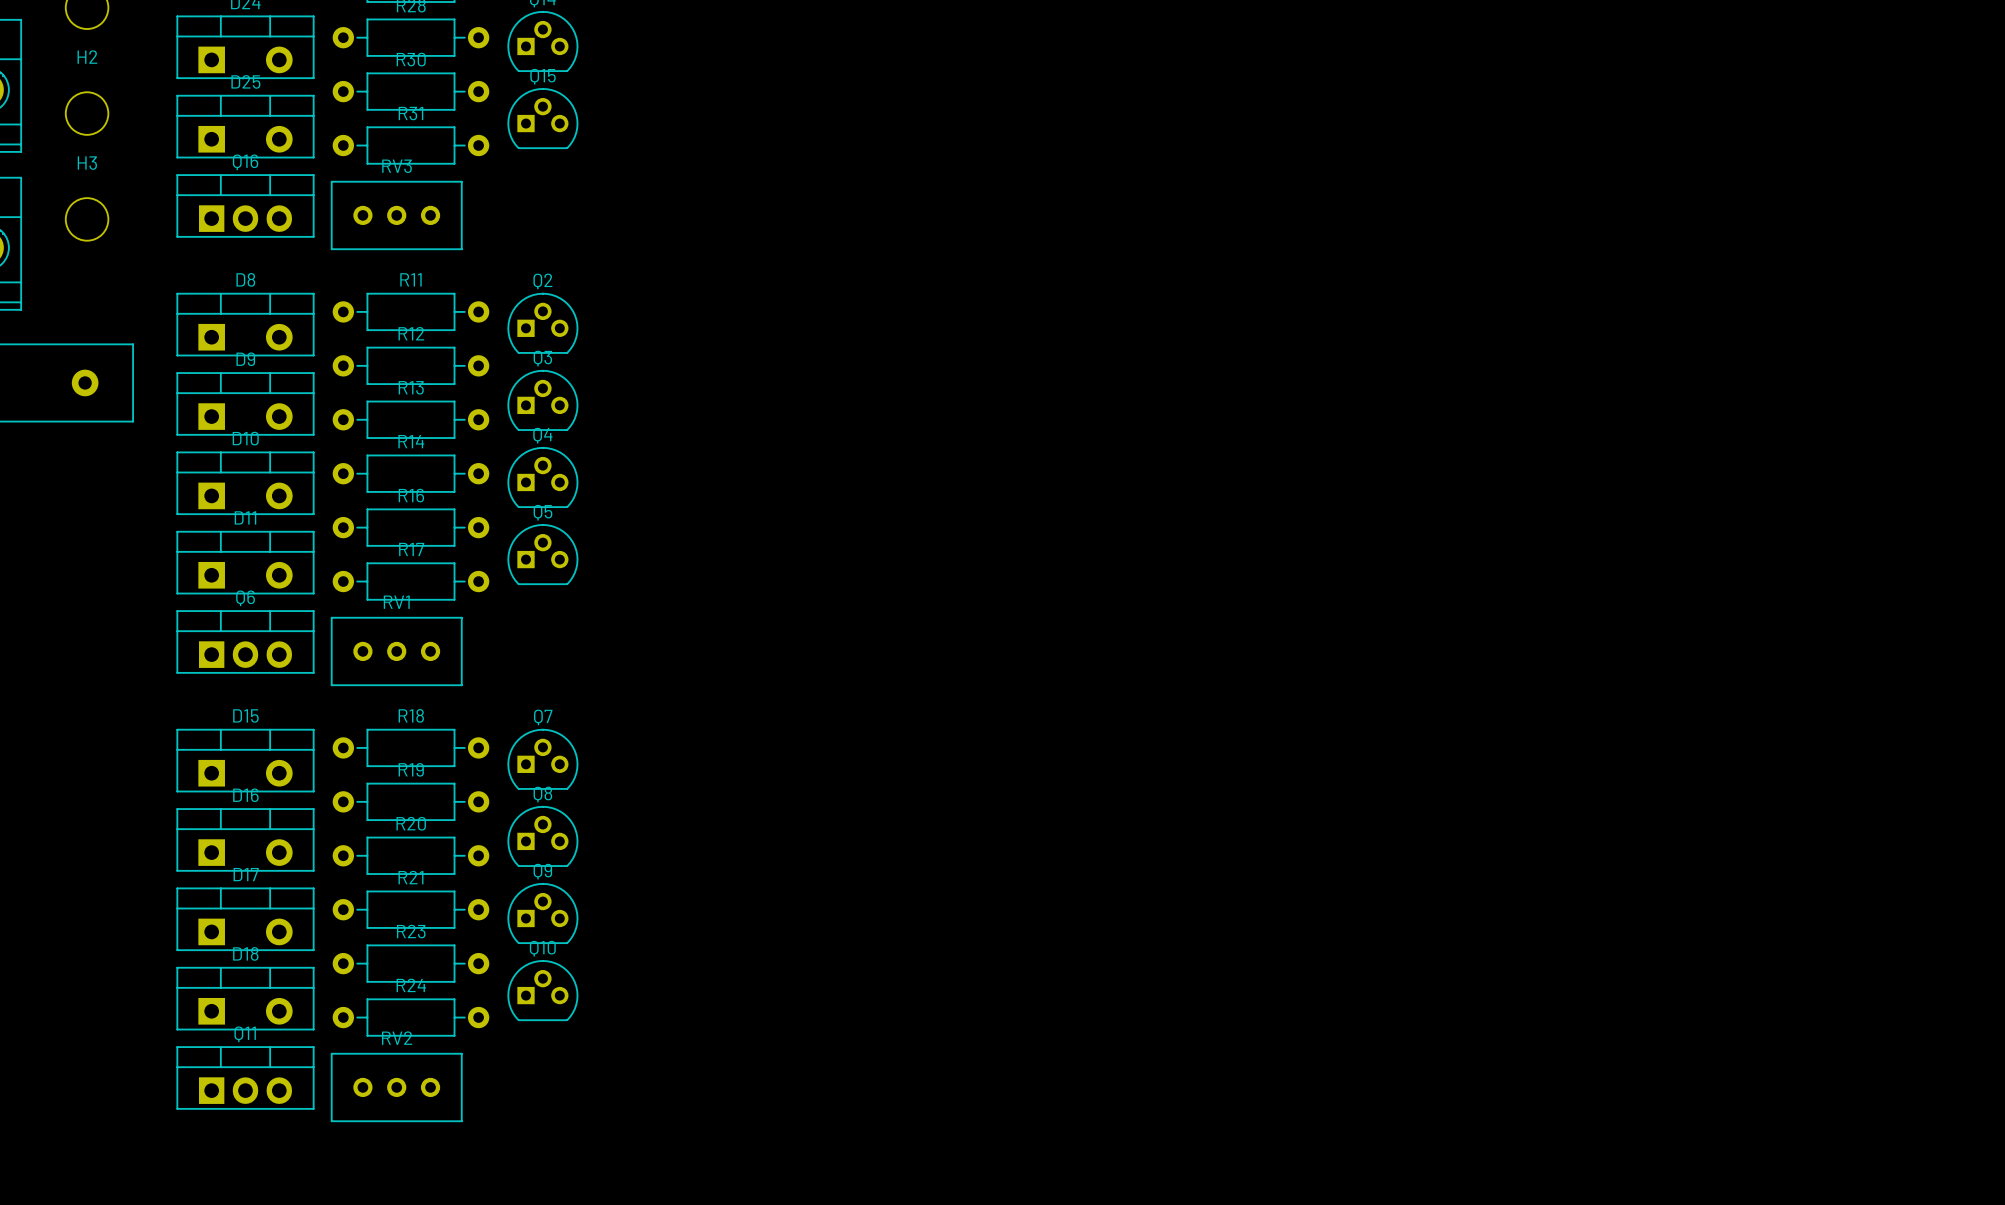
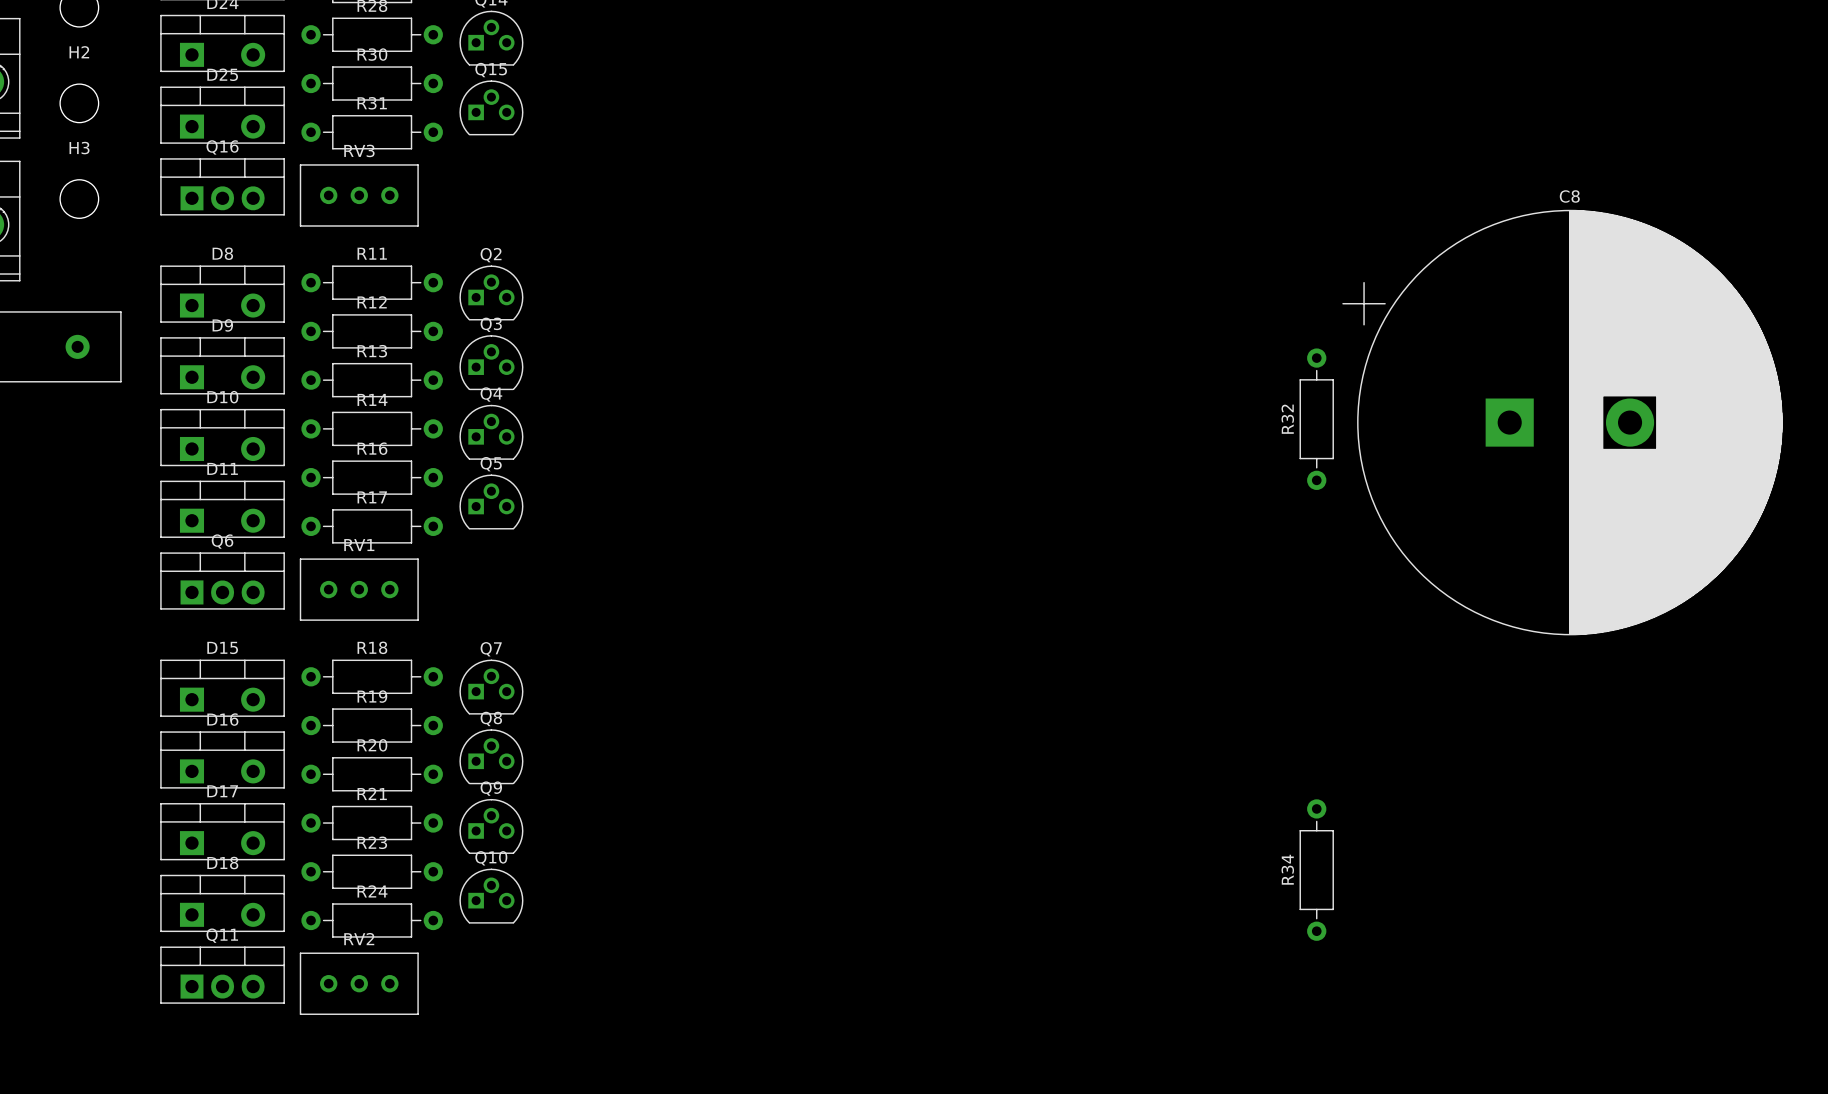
R32: none -> (1316, 419)
C8: none -> (1562, 422)
R34: none -> (1316, 870)

